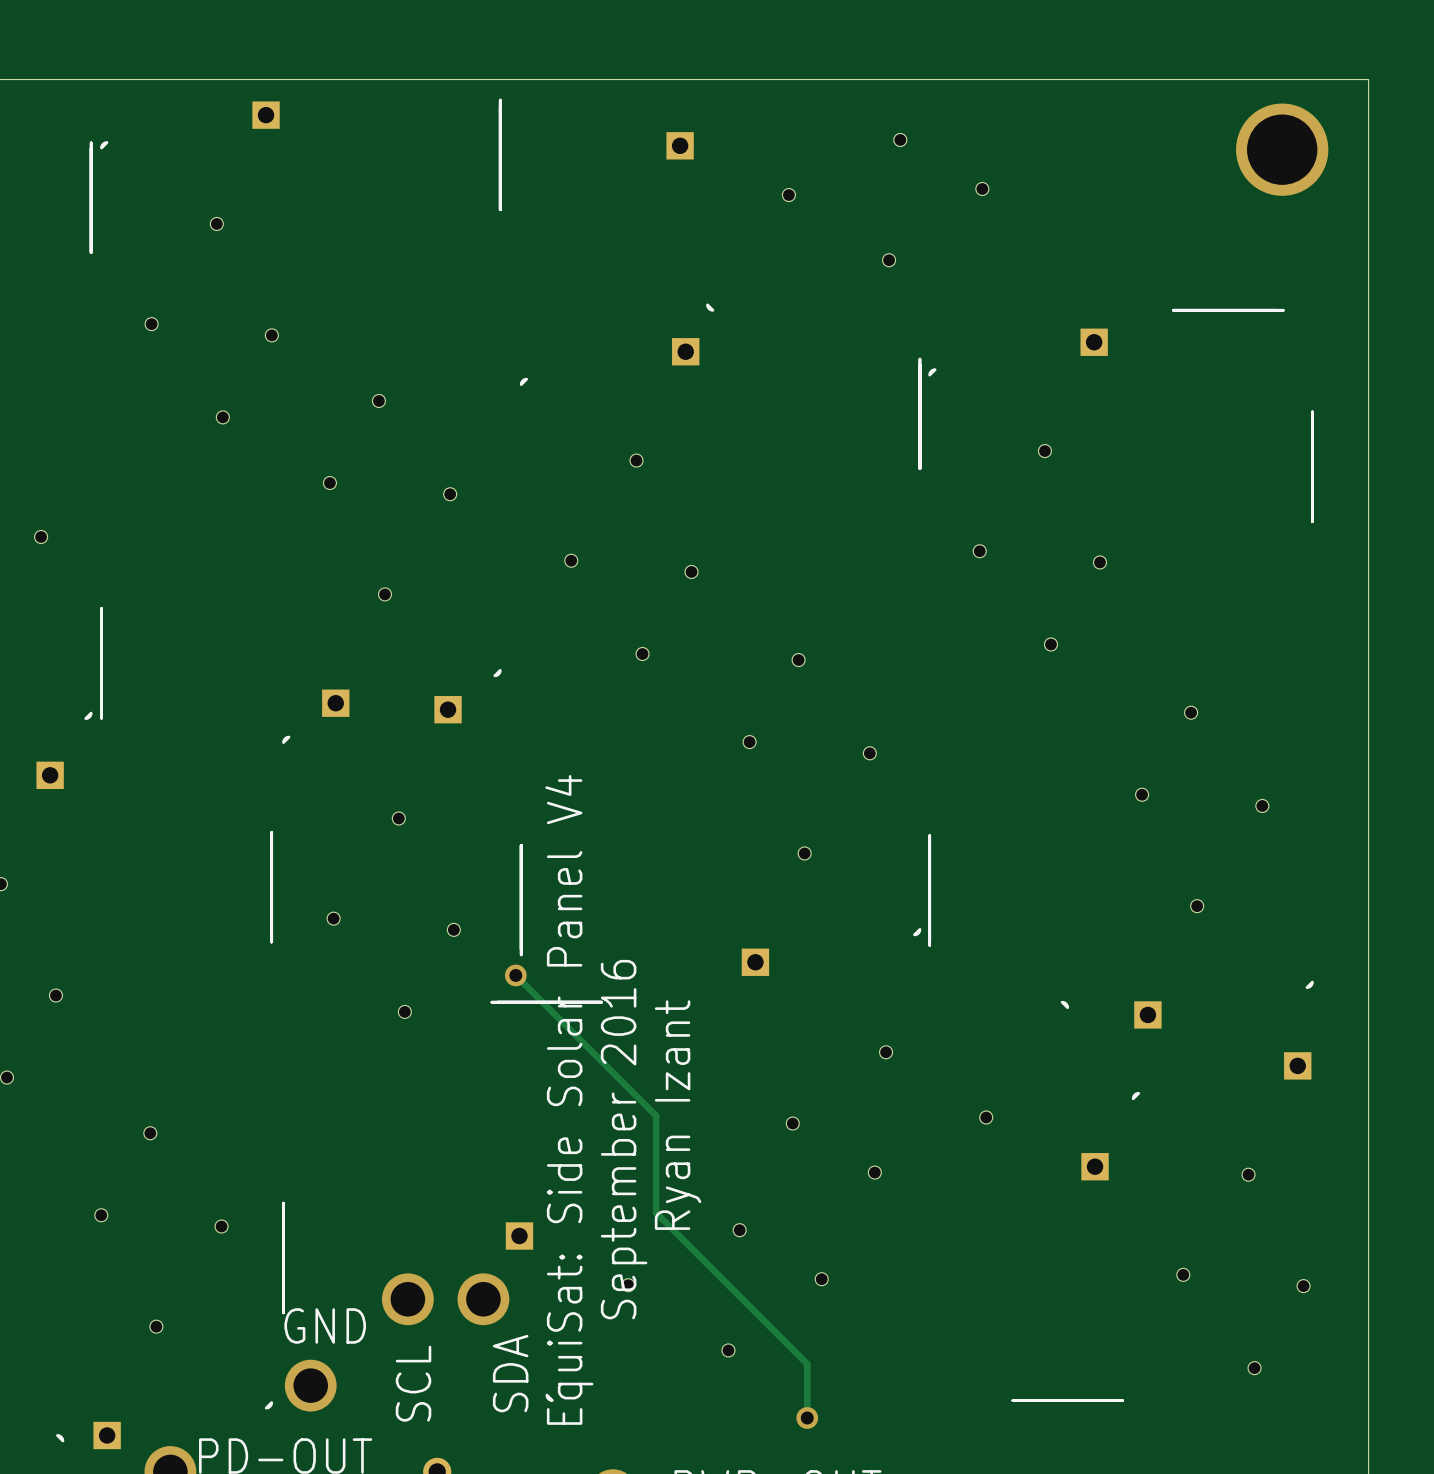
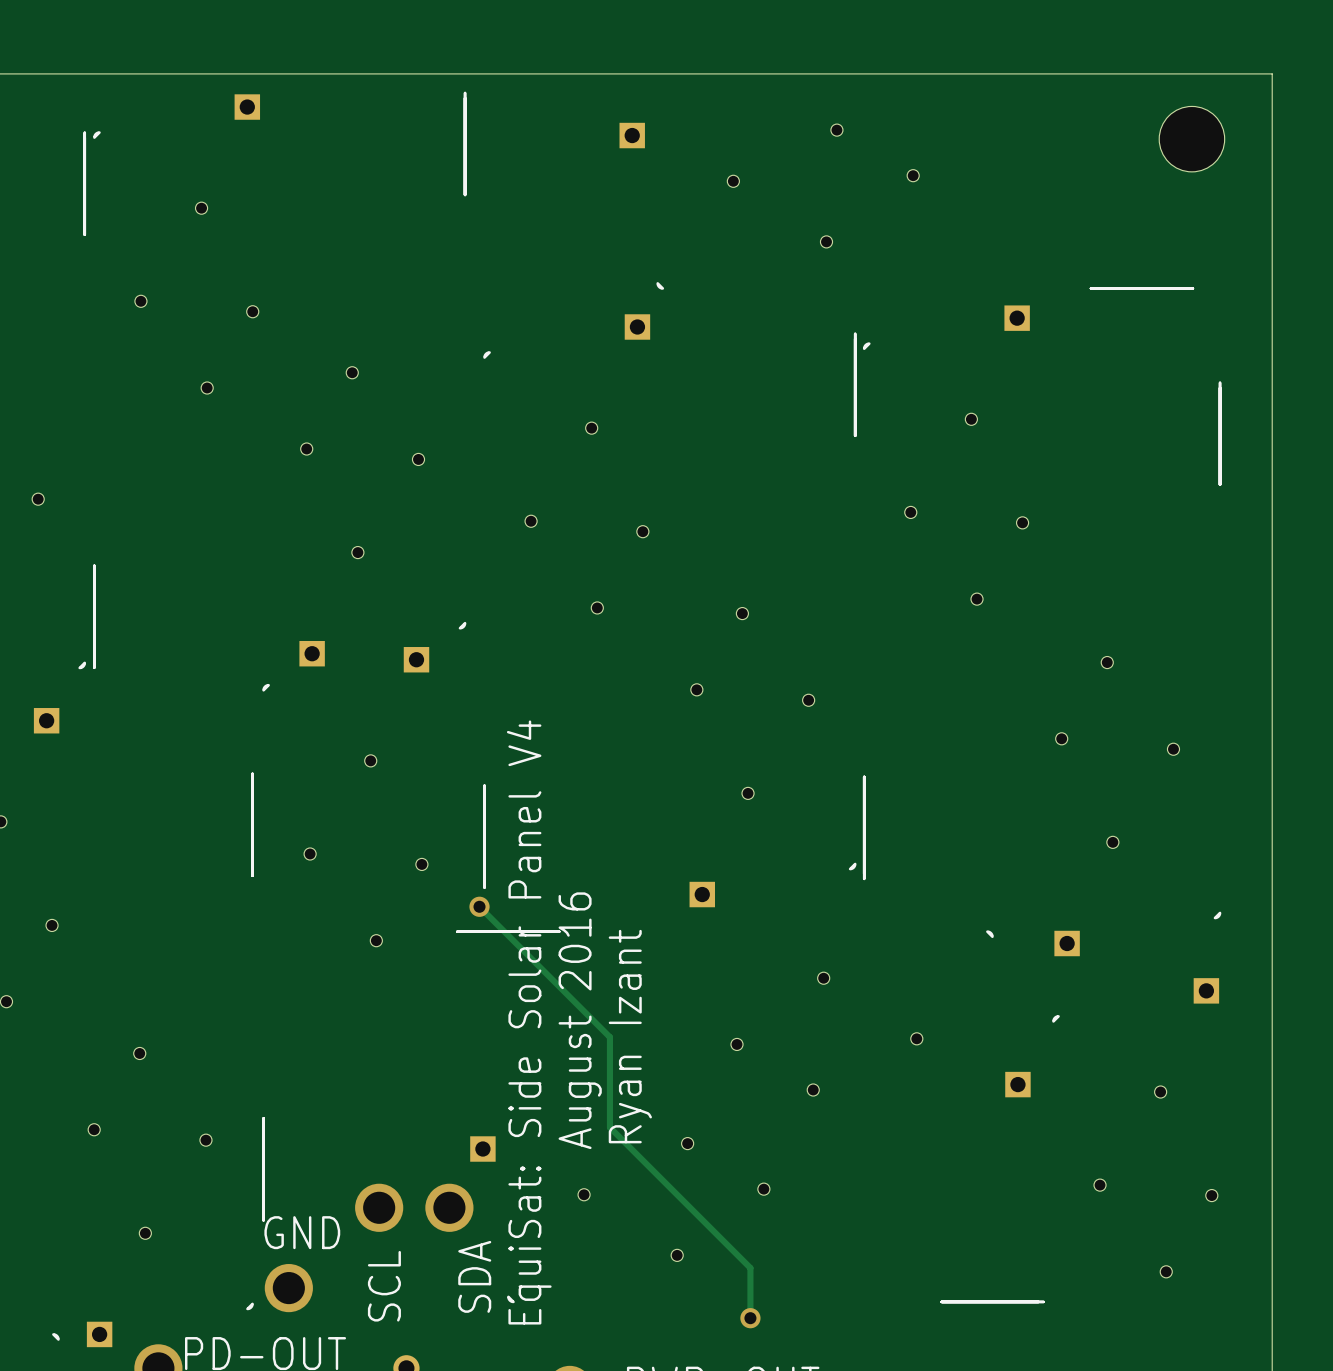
via: (1282, 149) -> none
hole: none -> (1191, 139)
text: September 2016 (624, 1139) -> August 2016 (580, 1020)

